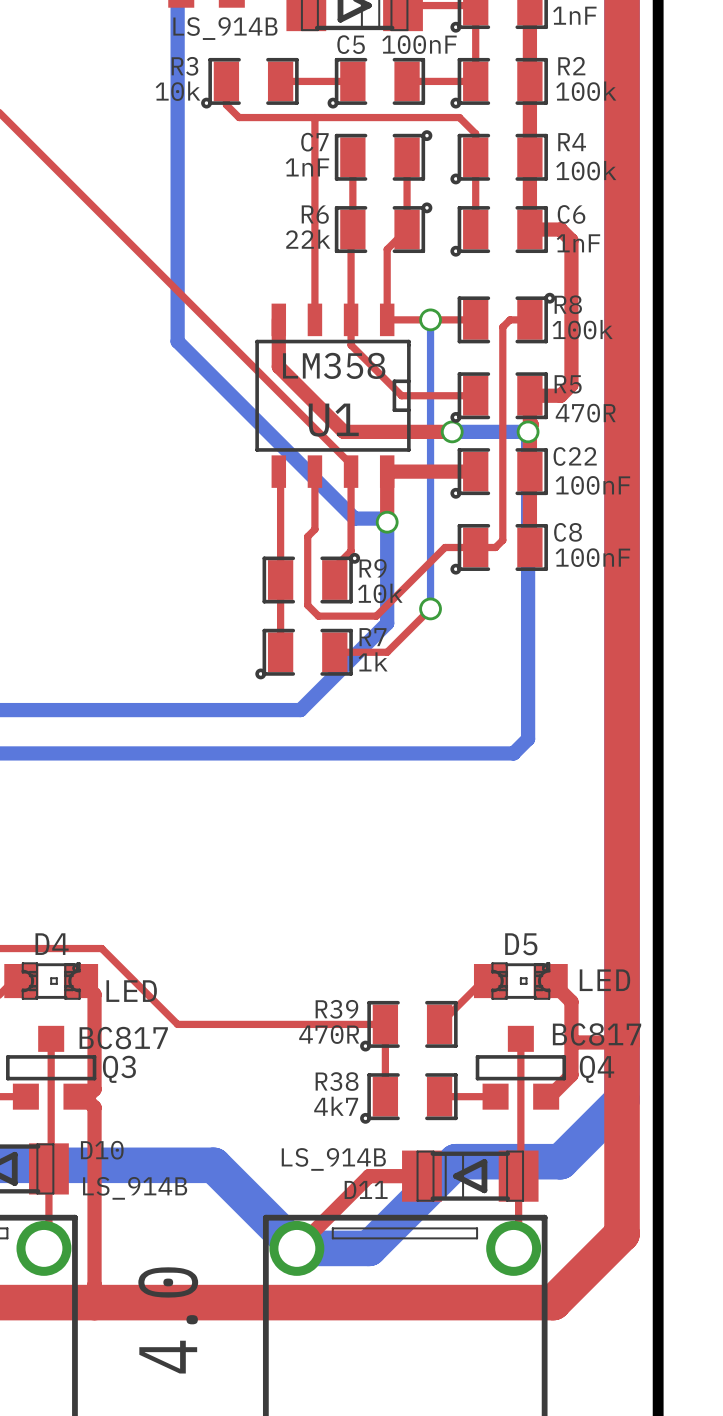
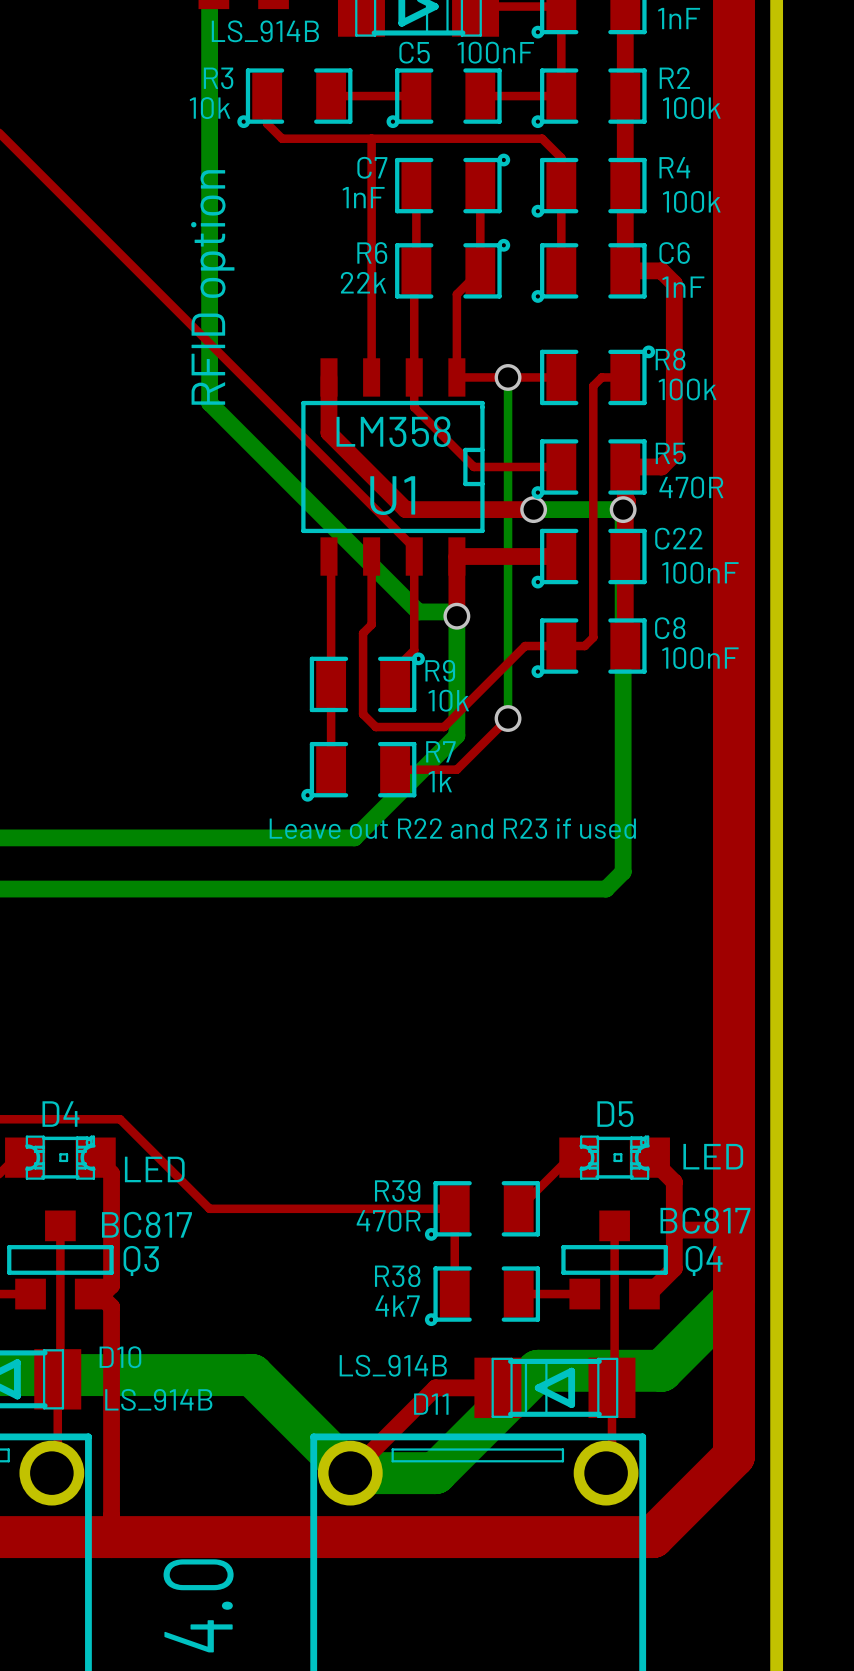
text: none -> RFID option (212, 287)
text: none -> Leave out R22 and R23 if used (452, 828)

